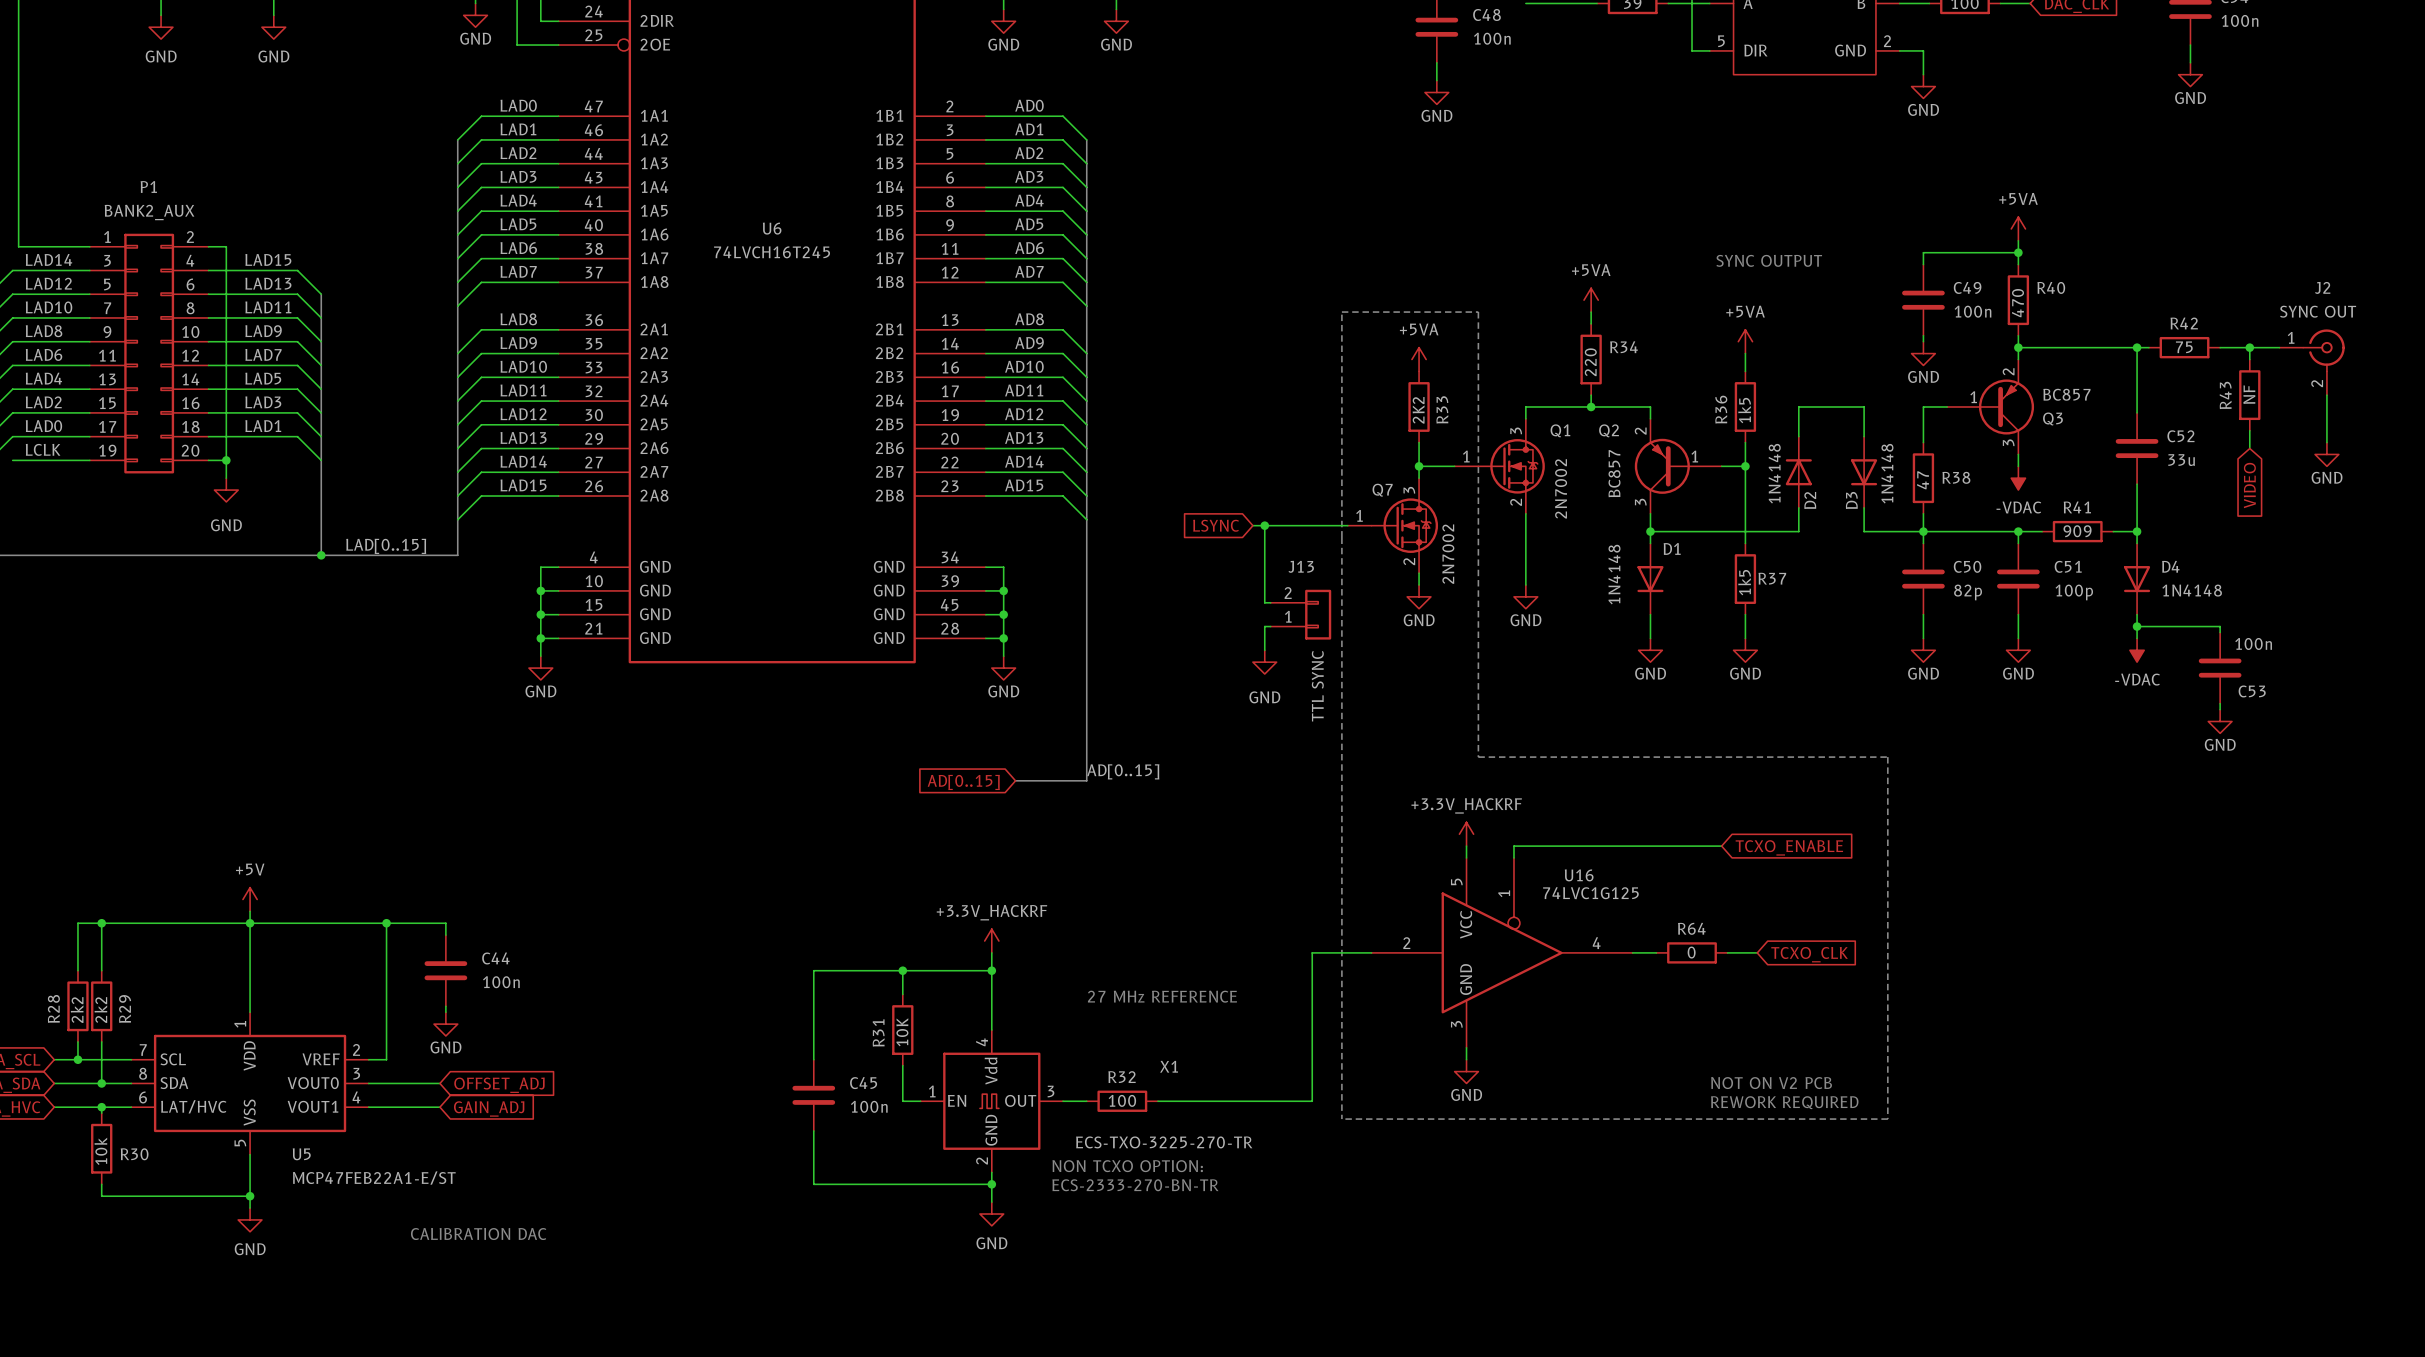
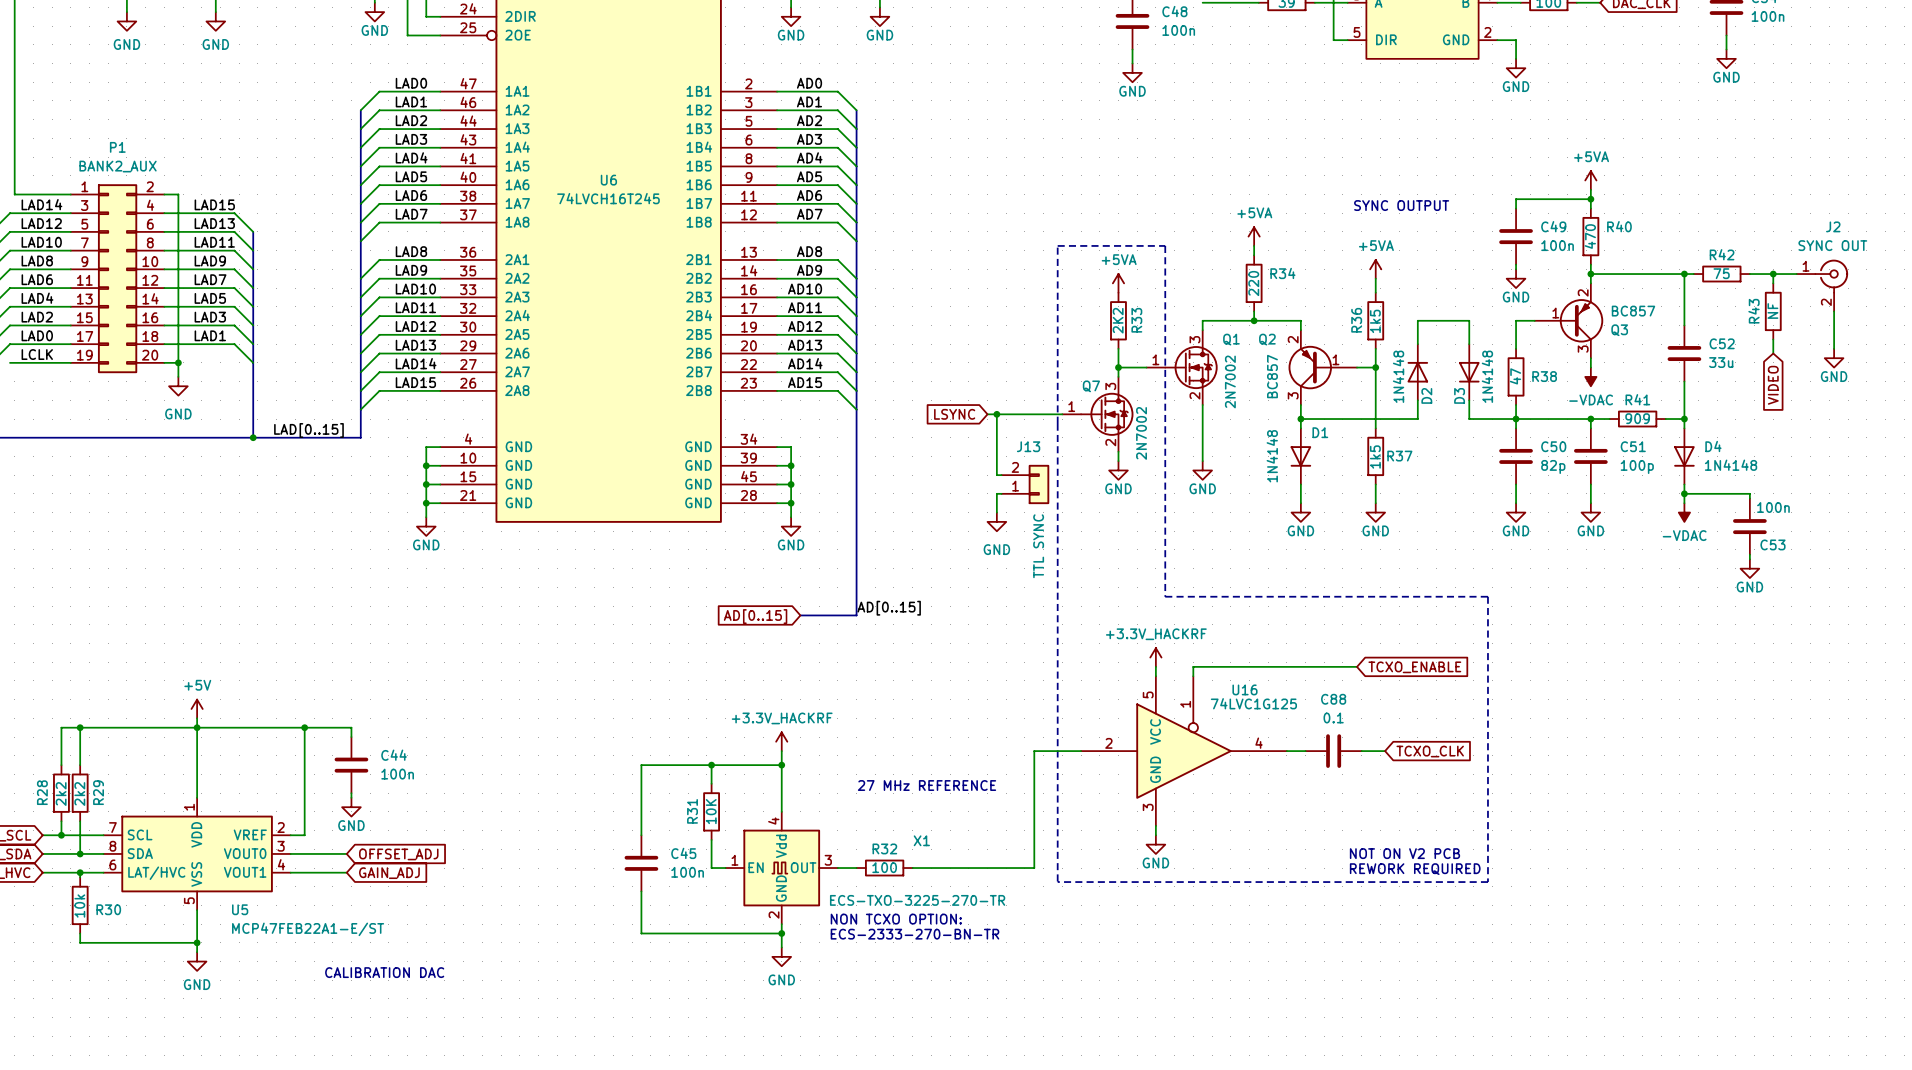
R64: 0 (1692, 952) -> none
C88: none -> 0.1 (1333, 751)

